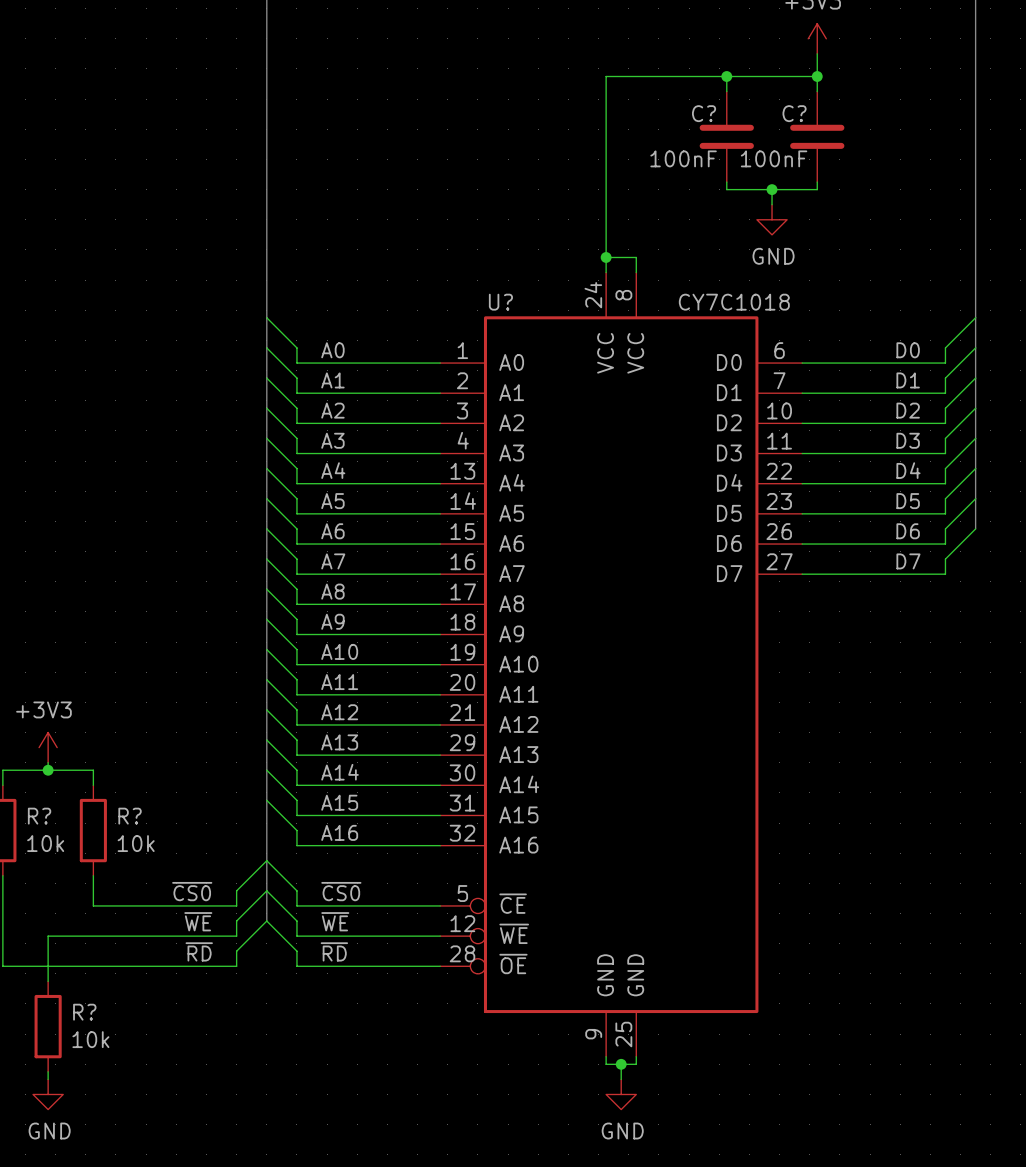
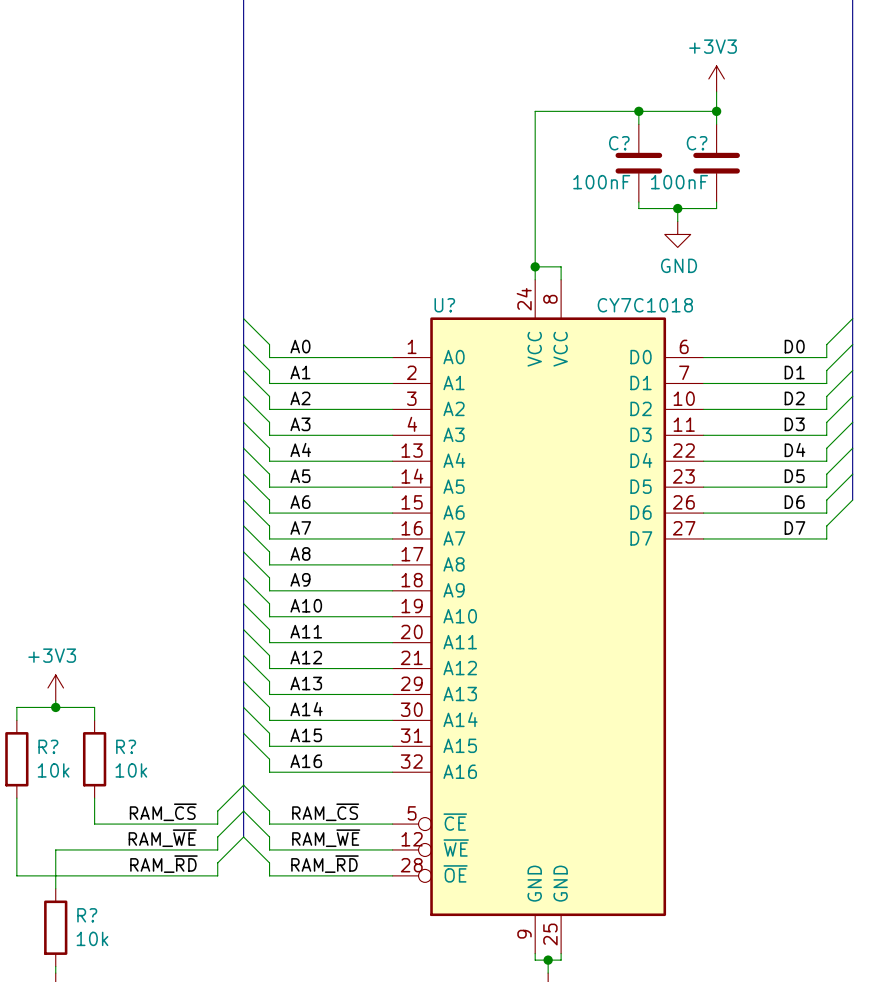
label: ~{CS0} (192, 891) -> RAM_~{CS} (163, 812)
label: ~{CS0} (341, 891) -> RAM_~{CS} (325, 812)
label: ~{WE} (198, 921) -> RAM_~{WE} (162, 838)
label: ~{WE} (335, 921) -> RAM_~{WE} (326, 838)
label: ~{RD} (199, 951) -> RAM_~{RD} (163, 864)
label: ~{RD} (334, 951) -> RAM_~{RD} (324, 864)

